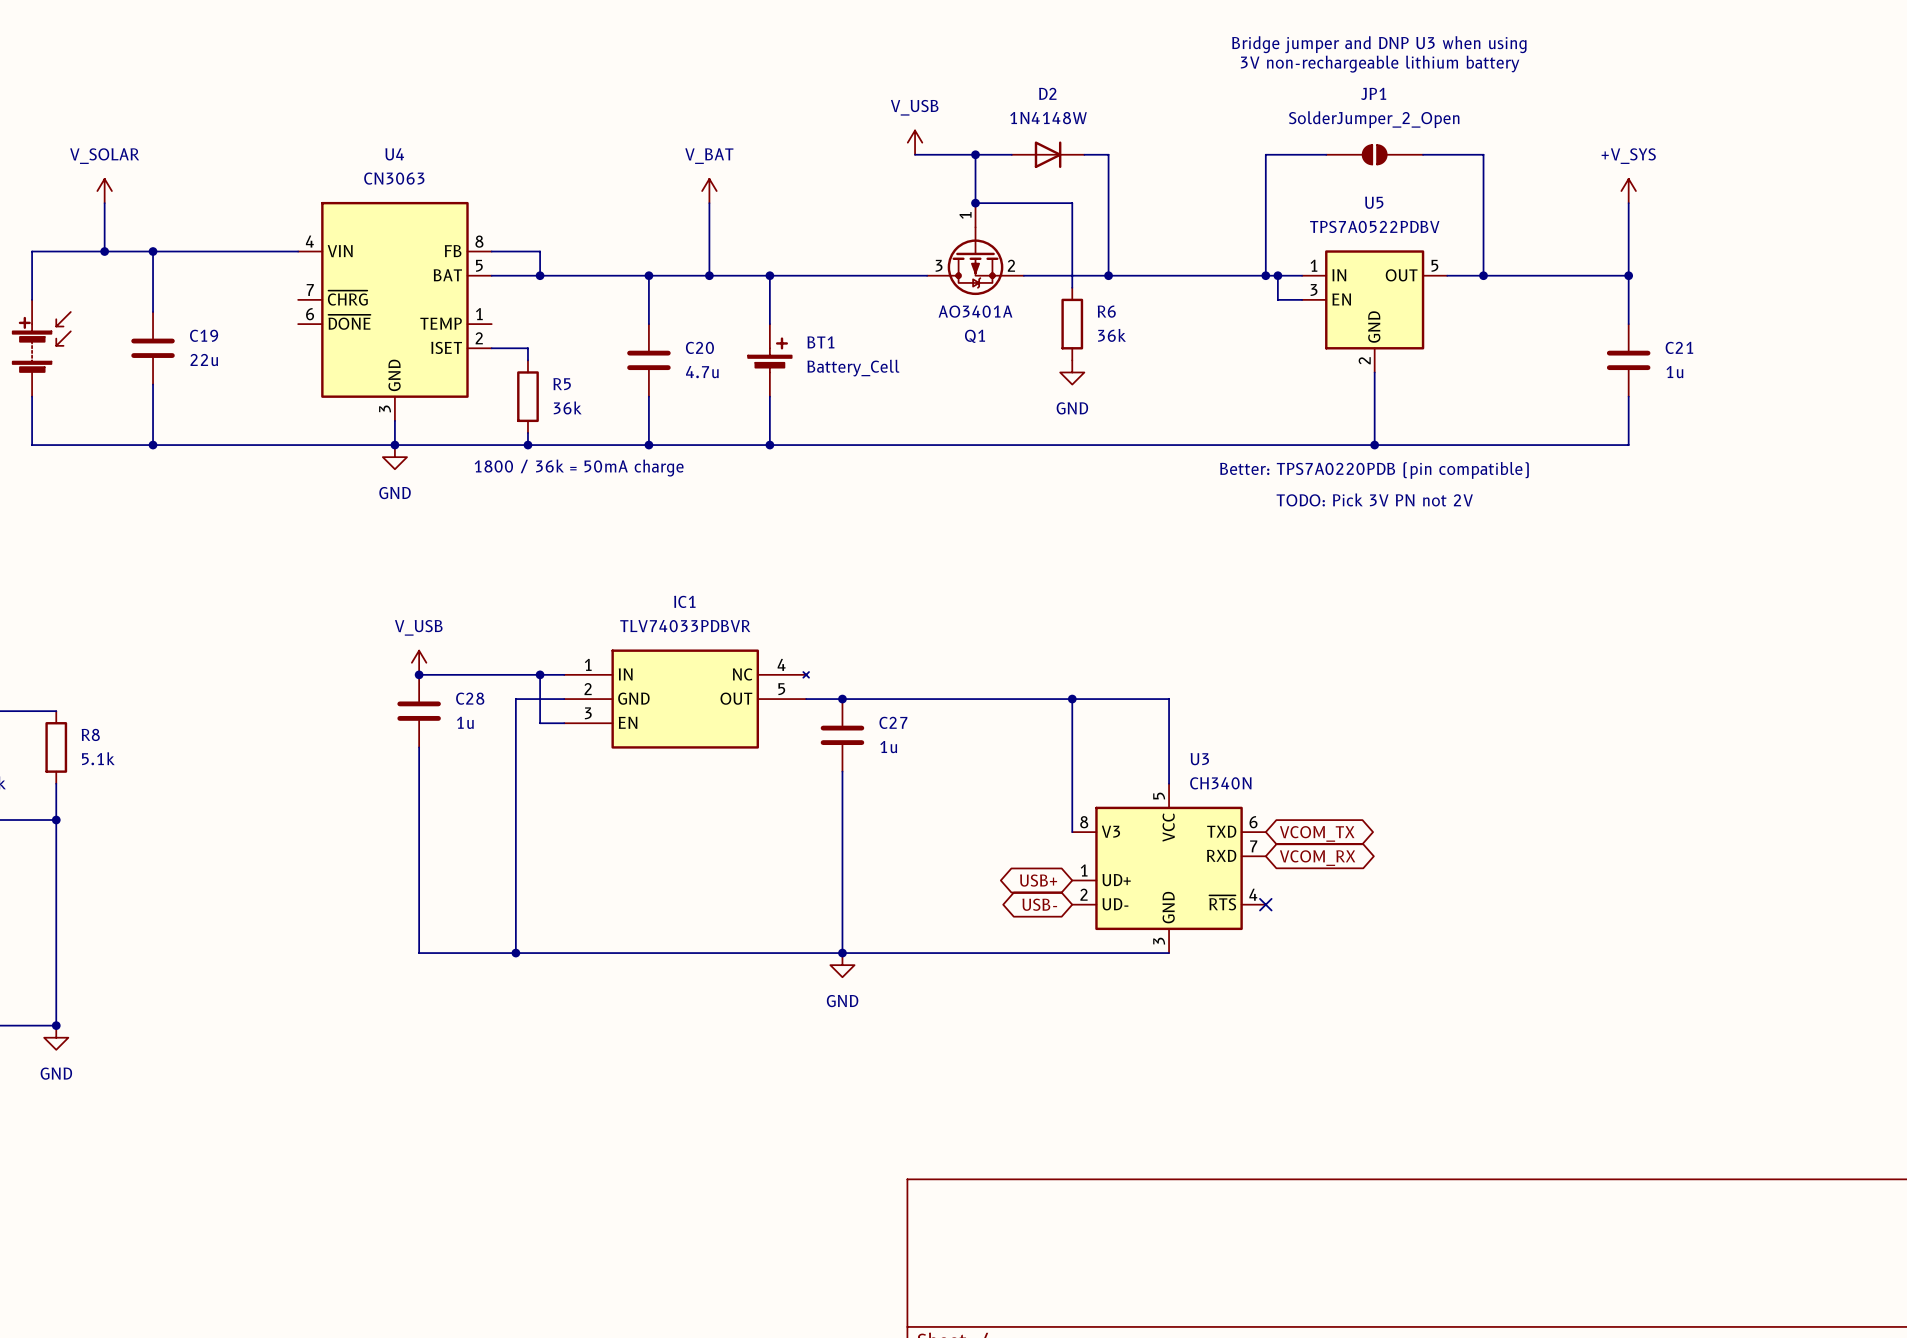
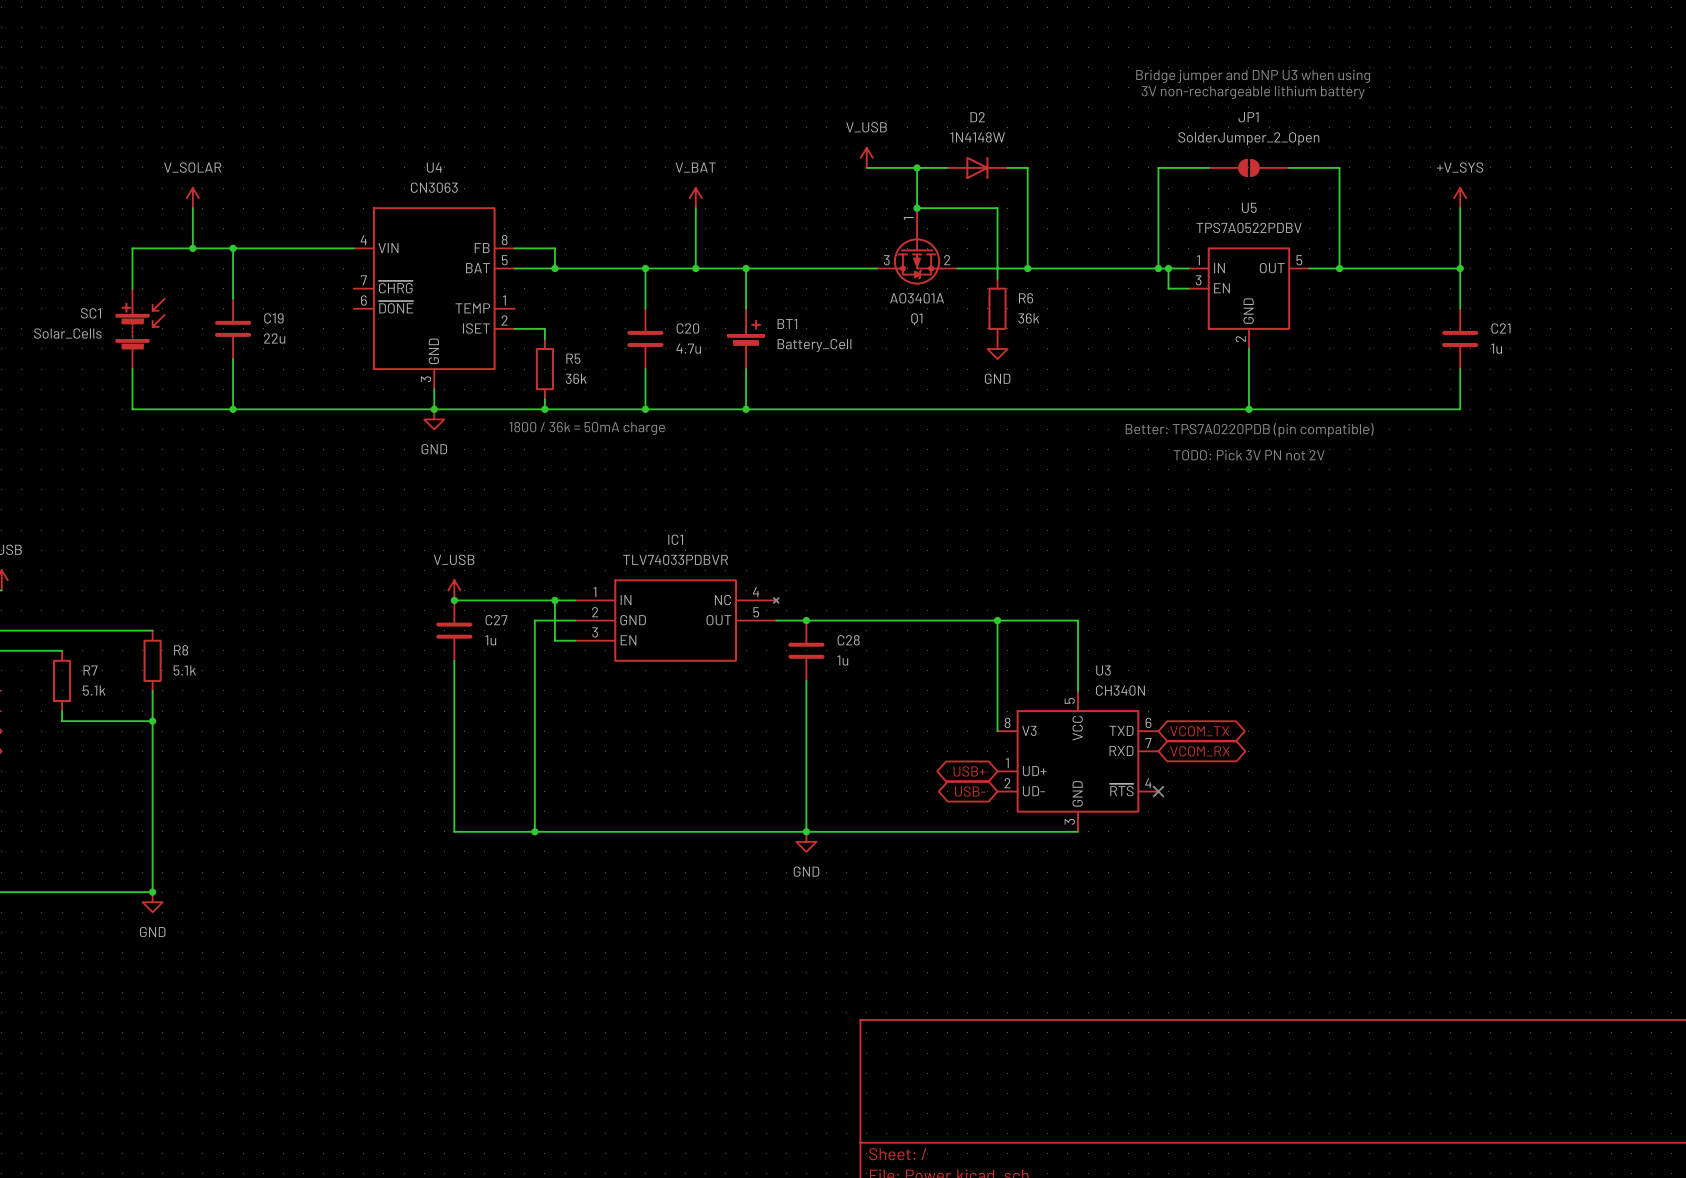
C28 name: C28 (470, 698) -> C27 (496, 620)
C27 name: C27 (893, 722) -> C28 (848, 640)

